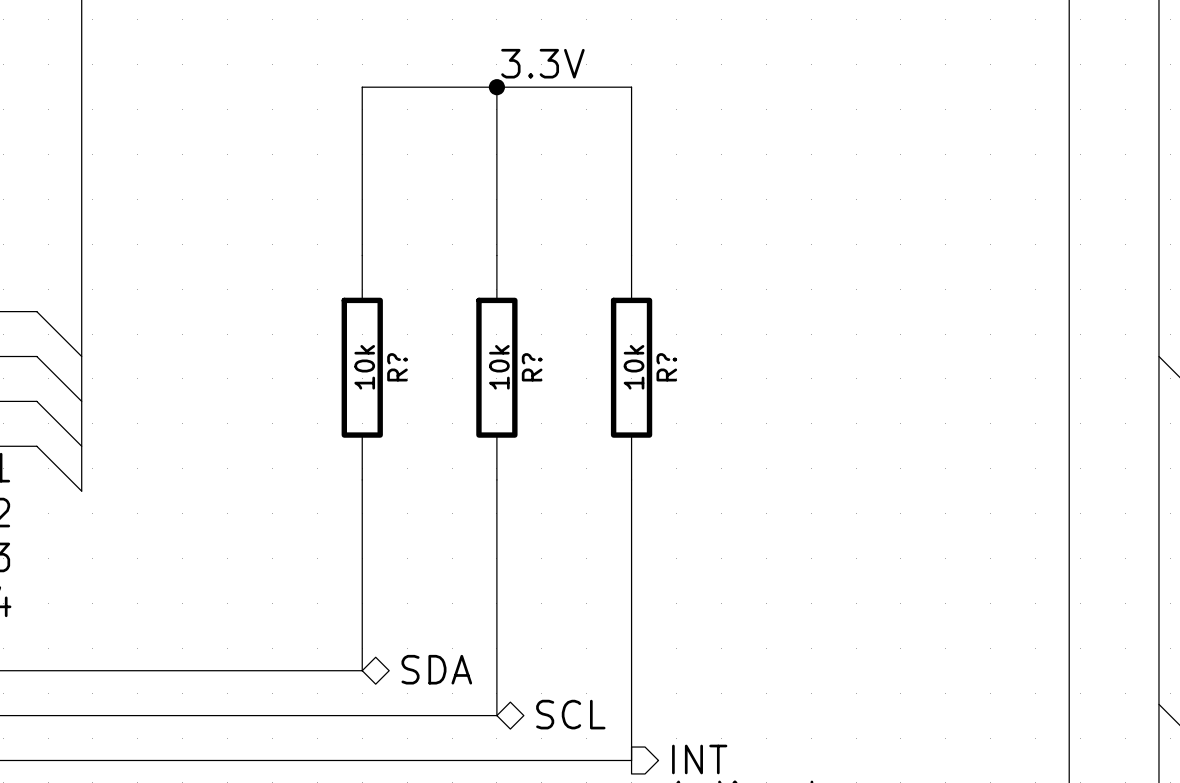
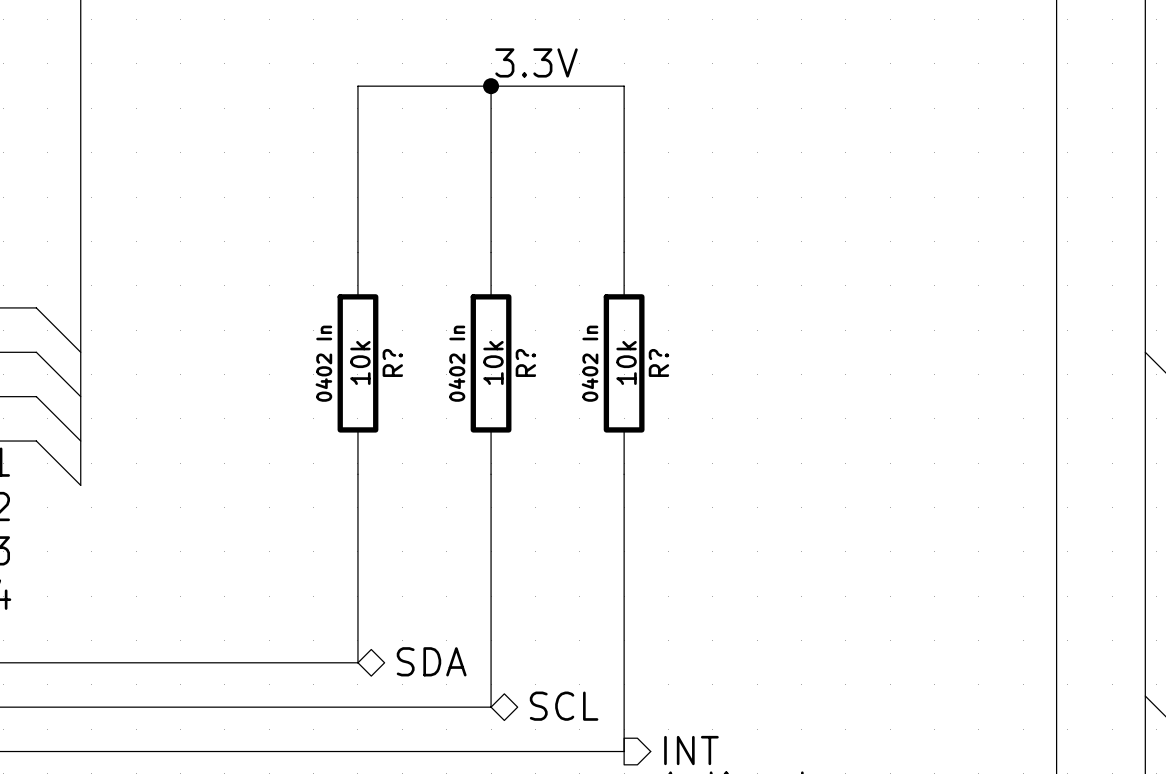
R? text: none -> 0402 In (323, 363)
R? text: none -> 0402 In (456, 363)
R? text: none -> 0402 In (590, 363)

